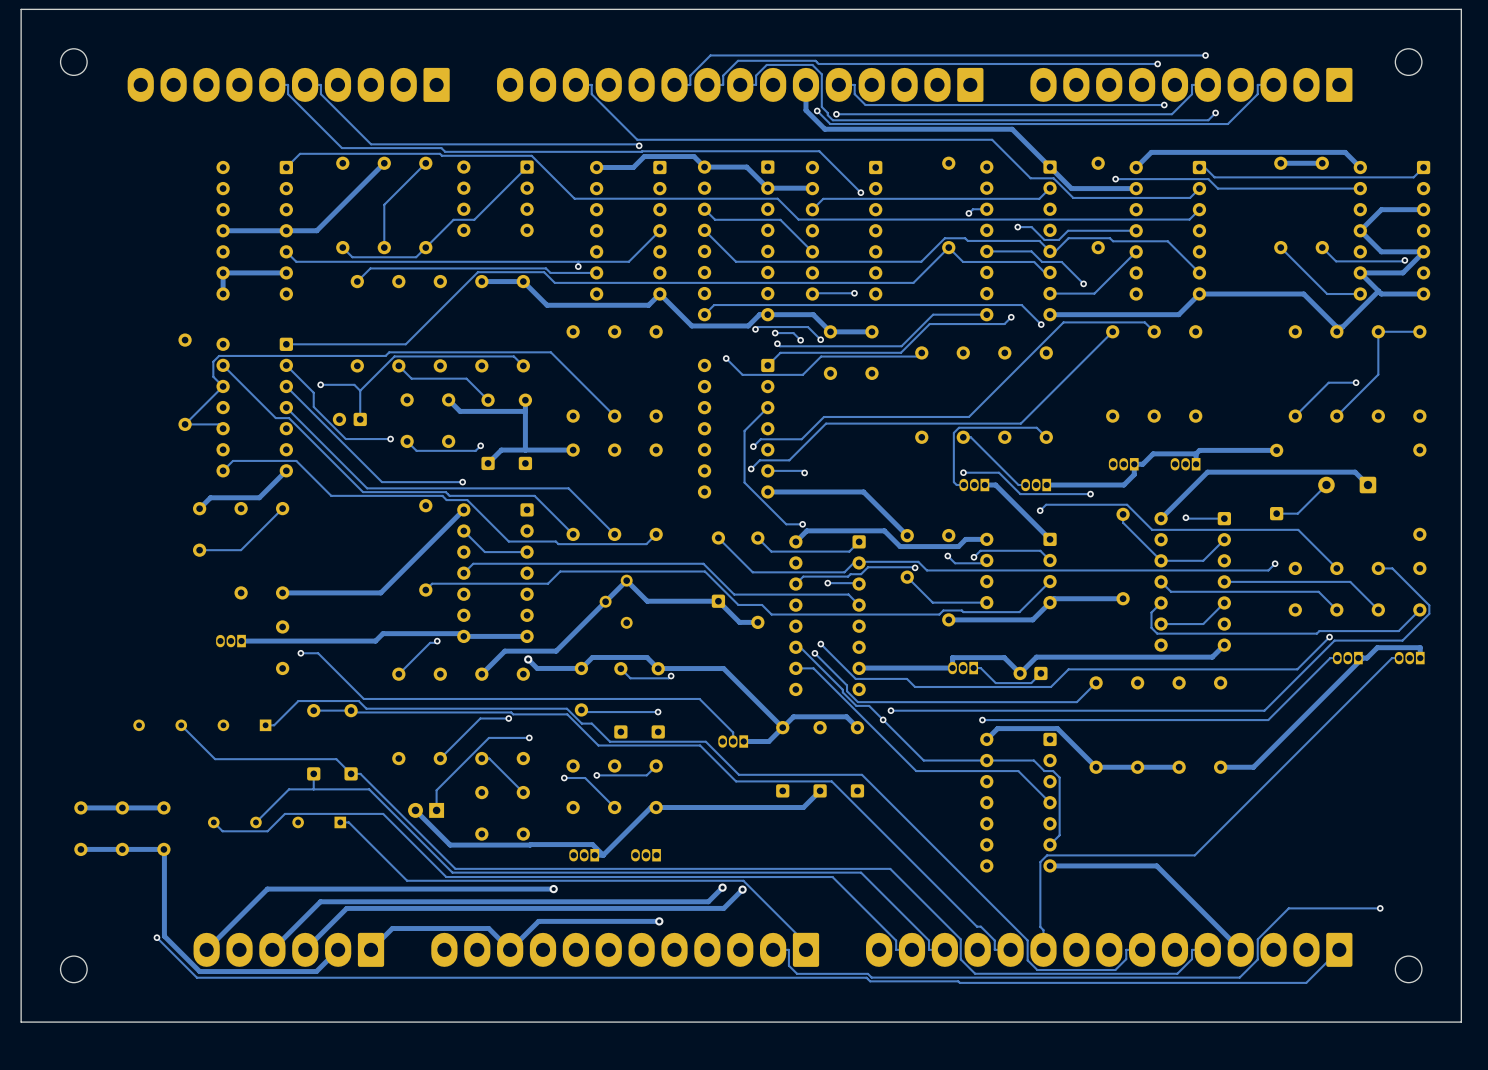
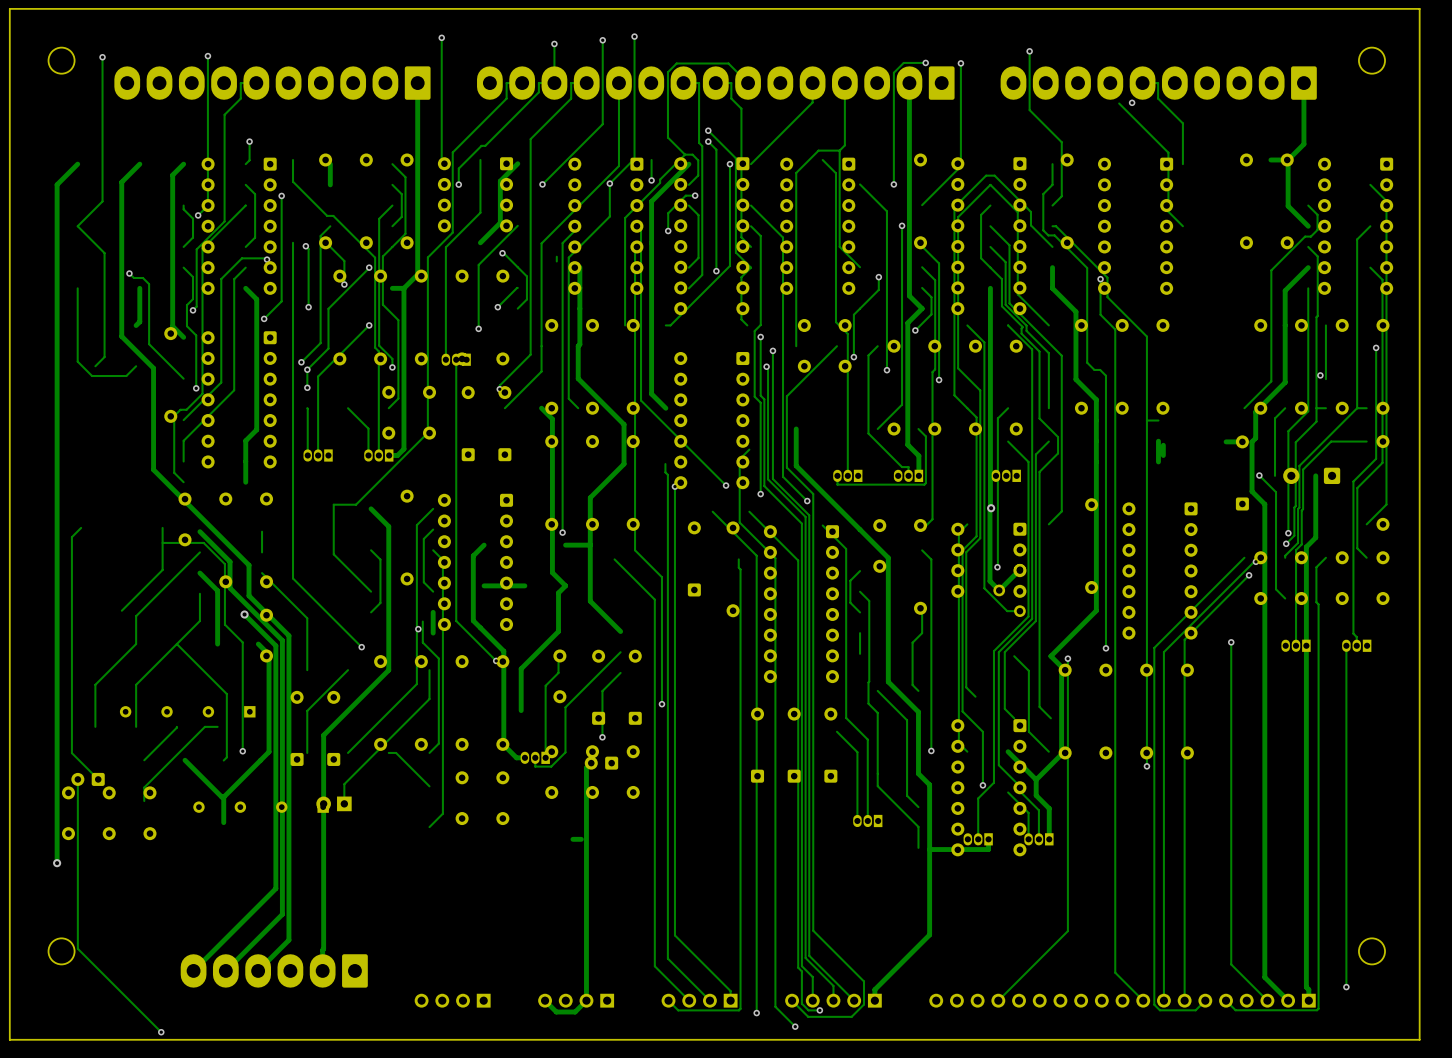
board edge: (1457, 9) (1461, 9) (1461, 1022) (21, 1022) -> (1419, 8) (1419, 1039) (9, 1039) (9, 1003)
track: none -> (634, 36) (634, 158) (609, 183) (609, 216) (568, 257) (568, 398) (578, 408)
via: none -> (634, 36)
track: none -> (441, 37) (441, 159)
via: none -> (441, 37)
track: none -> (602, 40) (602, 124) (542, 184)
via: none -> (602, 40)
track: none -> (554, 43) (554, 83) (538, 83) (538, 92) (485, 145) (481, 145) (458, 168) (458, 184)
via: none -> (554, 43)
track: none -> (1029, 51) (1029, 110) (1061, 142) (1061, 196) (1052, 205)
via: none -> (1029, 51)
track: (1205, 55) (710, 55) (690, 75) (690, 84) (674, 84) -> none
via: (1205, 55) -> none
track: none -> (207, 56) (207, 205) (198, 215)
via: none -> (207, 56)
track: none -> (102, 57) (102, 201) (77, 226) (104, 253) (104, 357) (95, 366)
via: none -> (102, 57)
track: (1157, 63) (818, 63) (815, 60) (738, 60) (723, 75) (723, 84) -> (688, 288) (702, 274) (702, 146) (699, 142) (699, 83)
track: none -> (925, 62) (903, 62) (893, 72) (893, 184)
via: none -> (925, 62)
track: none -> (960, 63) (960, 166) (922, 205)
via: none -> (960, 63)
via: (1157, 64) -> none
track: (272, 84) (288, 84) (288, 94) (341, 148) (441, 148) (445, 151) (819, 151) (860, 192) -> (256, 83) (240, 83) (240, 98) (224, 114) (224, 221) (196, 249) (196, 306) (193, 310)
track: (305, 84) (320, 84) (320, 94) (371, 144) (639, 145) -> none
track: none -> (417, 83) (417, 274) (403, 288)
track: none -> (522, 83) (506, 83) (506, 98) (452, 152) (452, 232) (427, 257) (427, 432) (356, 504) (333, 504) (333, 554) (371, 591)
track: (575, 84) (591, 84) (591, 94) (637, 139) (992, 139) (1030, 178) (1053, 178) (1073, 197) (1190, 197) (1199, 188) -> none
track: none -> (586, 83) (571, 83) (571, 98) (530, 139) (530, 354) (499, 385) (499, 389)
track: none -> (618, 83) (618, 166) (541, 243) (541, 371) (504, 408)
track: (756, 84) (756, 75) (766, 64) (812, 64) (821, 74) (821, 106) (832, 120) (1208, 120) (1215, 112) -> (731, 83) (731, 98) (741, 108) (741, 237) (751, 246)
track: none -> (748, 83) (728, 63) (676, 63) (667, 72) (667, 137) (685, 154)
track: (805, 84) (805, 110) (824, 129) (1012, 129) (1071, 188) (1136, 188) -> none
track: (838, 84) (854, 84) (854, 94) (865, 105) (1164, 105) -> (812, 83) (812, 102) (751, 164)
track: none -> (844, 83) (844, 145) (839, 150)
track: none -> (909, 83) (909, 295) (922, 308) (907, 322) (907, 444) (918, 455) (918, 475)
track: none -> (1142, 83) (1158, 83) (1158, 98) (1182, 123) (1182, 164)
track: (1207, 84) (1192, 84) (1192, 94) (1171, 114) (836, 114) -> none
track: (1273, 84) (1257, 84) (1257, 94) (1227, 124) (830, 124) (817, 110) -> none
track: none -> (1303, 83) (1303, 144) (1288, 159) (1288, 206) (1308, 226)
track: none -> (1119, 103) (1168, 152) (1168, 211) (1182, 226)
via: (817, 110) -> none
via: (1215, 112) -> none
via: (836, 114) -> none
track: none -> (708, 130) (735, 158) (735, 252) (751, 267) (741, 277) (741, 319) (747, 325)
via: none -> (708, 130)
track: none -> (249, 141) (249, 160) (245, 164)
via: none -> (249, 141)
track: none -> (708, 141) (716, 149) (716, 271)
via: none -> (708, 141)
via: (639, 145) -> none
track: none -> (839, 150) (839, 246) (860, 267)
track: none -> (839, 150) (818, 150) (796, 172) (796, 346)
track: none -> (685, 154) (692, 154) (698, 160) (698, 175) (688, 184)
track: none -> (685, 154) (625, 217) (625, 325)
track: none -> (293, 159) (293, 181) (327, 215) (333, 215) (375, 257) (375, 347) (378, 351) (378, 455)
track: (384, 163) (316, 230) (223, 230) -> none
track: (425, 163) (384, 204) (384, 247) -> none
track: none -> (480, 159) (480, 212) (445, 247) (445, 359)
track: none -> (651, 159) (651, 180)
track: none -> (822, 159) (835, 173) (835, 322) (847, 333) (847, 475)
track: (1305, 163) (1280, 163) -> none
track: none -> (77, 164) (57, 184) (57, 863)
track: none -> (139, 164) (121, 182) (121, 336) (153, 368) (153, 469) (249, 565) (249, 595) (288, 635) (288, 940) (258, 970)
track: none -> (183, 164) (172, 175) (172, 326) (183, 337)
track: (286, 167) (300, 153) (531, 155) (574, 198) (777, 198) (798, 219) (1189, 219) (1199, 209) -> none
track: none -> (330, 164) (330, 184)
track: none -> (392, 164) (405, 177) (405, 233) (382, 256) (382, 304) (398, 320) (398, 398) (388, 408)
track: (527, 167) (474, 219) (453, 219) (416, 257) (352, 257) (342, 247) -> none
track: none -> (517, 163) (500, 181) (500, 222) (480, 242)
track: (596, 167) (633, 167) (644, 156) (693, 156) (704, 167) (746, 167) (767, 188) (812, 188) -> none
track: none -> (688, 164) (651, 201) (651, 393) (665, 408)
track: none -> (729, 164) (729, 265) (670, 325) (665, 325)
via: none -> (729, 164)
track: none -> (1052, 164) (1052, 184) (1043, 194) (1043, 230) (1048, 235) (1054, 235) (1087, 268) (1087, 362) (1094, 369) (1100, 369) (1105, 375) (1105, 648)
track: (1360, 167) (1345, 152) (1151, 152) (1136, 167) -> none
track: (1423, 167) (1413, 177) (1214, 177) (1204, 167) (1199, 167) -> none
track: (1115, 179) (1208, 179) (1217, 188) (1360, 188) -> none
via: (1115, 179) -> none
via: none -> (651, 180)
via: none -> (609, 183)
track: none -> (245, 184) (255, 194) (255, 237) (245, 246)
track: none -> (392, 184) (401, 194) (401, 216) (392, 226)
via: none -> (458, 184)
via: none -> (542, 184)
track: none -> (860, 184) (886, 211) (886, 370)
via: none -> (893, 184)
track: (1050, 188) (1039, 198) (823, 198) (812, 209) -> none
track: none -> (1370, 184) (1386, 200) (1386, 504) (1366, 524)
via: (860, 192) -> none
track: none -> (281, 195) (281, 301) (264, 318)
via: none -> (281, 195)
track: none -> (695, 195) (685, 195) (668, 213) (668, 231)
via: none -> (695, 195)
track: none -> (183, 205) (183, 209) (193, 218) (193, 237) (183, 246)
track: none -> (245, 205) (202, 248) (202, 393) (186, 409) (180, 409) (174, 416) (174, 472) (183, 482)
track: none -> (392, 205) (379, 218) (379, 345) (392, 358) (392, 367)
track: (704, 209) (715, 219) (780, 219) (812, 251) -> none
track: none -> (688, 205) (698, 215) (698, 258) (688, 267)
track: none -> (751, 205) (783, 237) (783, 476) (807, 501)
track: (986, 209) (973, 209) (968, 213) -> none
track: none -> (990, 205) (981, 214) (981, 258) (1001, 279) (1001, 306) (1022, 326) (1021, 333) (1039, 351) (1039, 418) (1058, 437) (1058, 453) (1039, 471) (1039, 706) (1050, 718)
track: none -> (1308, 205) (1317, 214) (1317, 229) (1310, 236) (1305, 236) (1271, 270) (1271, 381) (1244, 408)
track: (1423, 209) (1381, 209) (1360, 230) (1381, 251) (1423, 251) (1402, 272) (1360, 272) (1381, 294) (1423, 294) -> none
via: (968, 213) -> none
via: none -> (198, 215)
track: (1017, 227) (1031, 227) (1044, 239) (1058, 239) (1068, 230) (1083, 230) -> none
via: (1017, 227) -> none
track: none -> (641, 225) (641, 400) (726, 485)
track: none -> (330, 226) (320, 235) (320, 343) (301, 362)
track: none -> (517, 225) (478, 264) (478, 328)
track: none -> (579, 225) (562, 243) (562, 532)
track: (659, 230) (628, 261) (296, 261) (286, 251) -> none
track: (704, 230) (735, 261) (921, 261) (944, 238) (965, 238) (967, 240) (1039, 240) (1050, 251) (1055, 251) (1068, 238) (1109, 238) (1113, 241) (1167, 241) (1199, 272) -> none
track: none -> (751, 226) (760, 236) (760, 324) (754, 331) (754, 396) (760, 402) (760, 494)
track: none -> (902, 225) (902, 404) (877, 429)
via: none -> (902, 225)
track: none -> (990, 226) (1009, 245) (1009, 303) (1061, 355) (1061, 511) (1048, 524)
track: (1136, 230) (1086, 230) -> (1146, 766) (1146, 336) (1107, 297) (1107, 277) (1056, 226)
track: none -> (1370, 226) (1357, 239) (1357, 408)
via: none -> (668, 231)
track: none -> (293, 242) (293, 578) (361, 647)
track: (1280, 247) (1327, 294) (1360, 294) -> none
track: (1322, 247) (1336, 261) (1404, 260) -> none
track: none -> (305, 246) (308, 248) (308, 307)
via: none -> (305, 246)
track: none -> (330, 246) (344, 261) (344, 284)
track: none -> (922, 246) (939, 263) (939, 380)
track: (986, 251) (1031, 251) (1042, 261) (1061, 261) (1083, 283) -> none
track: none -> (990, 246) (1005, 262) (1005, 304) (1026, 325) (1026, 330) (1048, 353) (1048, 408)
track: none -> (1052, 246) (1030, 225) (1030, 211) (994, 175) (986, 175) (954, 207) (954, 395) (976, 417) (976, 536) (962, 550) (962, 711) (982, 731) (982, 785)
track: (1136, 251) (1094, 293) (1050, 293) -> none
track: none -> (1308, 246) (1317, 256) (1316, 421) (1295, 442) (1294, 535) (1286, 543)
track: none -> (635, 250) (635, 550) (661, 577) (661, 704)
track: none -> (502, 253) (526, 276) (526, 299) (517, 308)
via: none -> (502, 253)
via: (1404, 260) -> none
track: none -> (267, 259) (241, 258) (221, 279) (221, 382) (183, 420)
via: none -> (267, 259)
via: (578, 266) -> none
track: none -> (183, 267) (193, 277) (193, 299) (186, 305) (186, 326) (196, 335) (196, 388)
track: none -> (245, 267) (234, 279) (234, 390) (183, 440) (183, 461)
track: (286, 272) (223, 272) (223, 294) -> none
track: none -> (369, 267) (328, 308) (328, 348) (307, 369)
via: none -> (369, 267)
track: (596, 272) (550, 272) (546, 268) (370, 268) (357, 281) -> none
track: none -> (579, 267) (578, 378) (624, 424) (624, 464) (590, 497) (590, 601) (620, 631)
track: none -> (922, 267) (935, 280) (935, 369) (932, 372) (932, 519) (922, 529)
track: (1050, 272) (1044, 272) (1034, 261) (963, 261) (948, 247) (913, 282) (554, 282) (544, 272) (477, 272) (405, 344) (286, 344) -> none
track: none -> (1052, 267) (1052, 288) (1075, 311) (1075, 379) (1096, 399) (1096, 610) (1050, 656) (1061, 666) (1061, 754) (1036, 779)
track: none -> (1308, 267) (1285, 290) (1285, 382) (1255, 411) (1255, 438) (1252, 441) (1252, 491) (1264, 504) (1264, 977) (1288, 1000)
track: none -> (1370, 267) (1382, 279) (1382, 462) (1357, 488) (1357, 548) (1366, 557)
via: none -> (716, 271)
track: none -> (129, 273) (133, 277) (142, 277) (149, 284) (149, 344) (183, 378)
via: none -> (129, 273)
track: (481, 281) (523, 281) (547, 305) (648, 305) (659, 294) (691, 325) (748, 325) (759, 314) (813, 314) (830, 331) (871, 331) -> none
track: none -> (878, 277) (878, 289) (853, 314) (853, 357)
via: none -> (878, 277)
via position: (1083, 283) -> (1100, 279)
track: none -> (1100, 279) (1100, 314) (1115, 329) (1115, 972) (1143, 1000)
via: none -> (344, 284)
track: (1378, 291) (1342, 327) (1336, 327) -> none
track: none -> (517, 287) (497, 307)
track: (854, 293) (812, 294) -> none
via: (854, 293) -> none
track: none -> (922, 287) (931, 297) (931, 314) (915, 330)
track: none -> (77, 288) (77, 361) (92, 376) (126, 376) (136, 366)
track: none -> (139, 288) (139, 321) (136, 325)
track: none -> (245, 288) (256, 299) (256, 429) (245, 440) (245, 482)
track: none -> (403, 288) (403, 449) (397, 455) (389, 455)
track: none -> (403, 288) (392, 288)
track: none -> (990, 288) (990, 581) (999, 590) (1019, 569)
track: none -> (1308, 288) (1308, 411) (1288, 431) (1288, 533)
via: none -> (308, 307)
via: none -> (497, 307)
track: (704, 314) (714, 305) (1021, 305) (1041, 324) -> none
track: (986, 314) (933, 314) (901, 346) (779, 346) (777, 343) -> none
track: (1050, 314) (1178, 314) (1199, 294) (1303, 294) (1336, 327) -> none
via: none -> (193, 310)
track: (1011, 317) (1004, 324) (929, 324) (900, 352) (780, 352) (767, 365) -> none
via: (1011, 317) -> none
via: (1041, 324) -> none
via: none -> (264, 318)
track: (755, 329) (757, 327) (807, 327) (820, 339) -> none
via: (755, 329) -> none
track: none -> (369, 325) (318, 376) (318, 455)
via: none -> (369, 325)
track: none -> (967, 325) (984, 342) (984, 588) (1007, 611) (1019, 611)
track: none -> (1008, 325) (1032, 349) (1032, 618) (998, 652) (998, 765) (1021, 787) (1021, 792) (1038, 810) (1038, 839)
track: none -> (1048, 325) (1017, 294) (1017, 212) (990, 184) (958, 217) (958, 368) (980, 390) (980, 538) (966, 552) (966, 687) (975, 696)
track: (1112, 331) (1020, 423) (826, 423) (789, 460) (759, 460) (751, 468) -> none
track: (1154, 331) (1144, 322) (1063, 322) (968, 416) (824, 416) (801, 439) (760, 439) (753, 446) -> none
track: none -> (1325, 325) (1325, 379)
track: (1419, 331) (1378, 331) (1378, 374) (1336, 416) -> none
track: (775, 333) (793, 333) (800, 340) -> none
via: (775, 333) -> none
via: none -> (478, 328)
via: none -> (915, 330)
via: (820, 339) -> none
via: (800, 340) -> none
via: (777, 343) -> none
track: none -> (760, 337) (760, 395) (764, 399) (764, 486) (801, 523) (801, 966) (812, 977) (812, 1000)
via: none -> (760, 337)
track: none -> (836, 346) (786, 396) (786, 467) (813, 493) (813, 930) (863, 981) (863, 1004) (851, 1016) (808, 1016) (792, 1000)
track: none -> (877, 346) (868, 355) (868, 433) (902, 467) (908, 467) (908, 475)
track: (921, 352) (918, 356) (821, 356) (802, 374) (742, 374) (726, 358) -> none
track: none -> (1376, 347) (1376, 458) (1353, 481) (1353, 633) (1356, 637) (1356, 645)
via: none -> (1376, 347)
track: none -> (772, 350) (772, 478) (809, 515) (809, 955) (854, 1000)
via: none -> (772, 350)
via: (726, 358) -> none
via: none -> (853, 357)
track: (223, 365) (275, 418) (289, 418) (363, 492) (445, 492) (449, 495) (534, 495) (573, 534) -> none
track: (286, 365) (313, 392) (313, 406) (345, 439) (390, 439) -> none
track: (398, 365) (411, 378) (466, 378) (488, 400) -> none
track: (523, 365) (513, 356) (394, 356) (360, 390) -> none
track: none -> (456, 359) (456, 620) (496, 660)
part: none -> (456, 359)
via: none -> (301, 362)
track: none -> (766, 366) (768, 479) (805, 516) (805, 958) (833, 985) (833, 1000)
via: none -> (766, 366)
via: none -> (392, 367)
track: none -> (307, 369) (307, 387)
via: none -> (307, 369)
via: none -> (886, 370)
track: (1356, 382) (1328, 382) (1295, 416) -> none
track: (320, 384) (354, 384) (360, 390) -> none
via: (320, 384) -> none
track: (286, 386) (381, 482) (462, 482) -> none
via: none -> (939, 380)
track: (360, 390) (360, 419) -> none
via: none -> (196, 388)
via: none -> (307, 387)
via: none -> (499, 389)
track: (448, 399) (460, 411) (525, 411) -> none
track: (525, 400) (525, 450) -> none
track: (286, 407) (367, 488) (568, 488) (614, 534) -> none
track: (767, 407) (744, 430) (744, 482) (786, 524) (802, 524) -> none
track: none -> (307, 408) (307, 455)
track: none -> (348, 408) (368, 428) (368, 455)
track: none -> (541, 408) (552, 419) (552, 572) (565, 585) (558, 592) (558, 631) (521, 668) (521, 710)
track: (614, 416) (550, 352) (389, 352) (385, 355) (219, 355) (213, 361) (213, 376) (223, 386) (185, 424) (218, 424) (223, 428) -> none
track: none -> (1008, 408) (997, 418) (997, 567)
track: none -> (1285, 408) (1275, 418) (1275, 475)
track: none -> (1325, 408) (1316, 408)
track: none -> (1357, 408) (1299, 465) (1298, 542) (1285, 557)
track: none -> (1366, 408) (1357, 408)
part: (349, 419) -> none
track: none -> (1158, 420) (1146, 420)
track: none -> (796, 429) (796, 465) (888, 557) (888, 681) (918, 712) (918, 773) (929, 784) (929, 934) (874, 989) (874, 1000)
track: none -> (918, 429) (925, 436) (924, 484) (837, 484) (837, 475)
track: (963, 437) (970, 437) (1018, 485) (1025, 485) -> none
track: (1046, 437) (1036, 427) (959, 427) (953, 432) (953, 482) (956, 485) (963, 485) -> none
via: (390, 439) -> none
track: (407, 441) (416, 450) (475, 450) (480, 445) -> none
via: (480, 445) -> none
via: (753, 446) -> none
track: none -> (1158, 441) (1158, 461)
track: (573, 450) (501, 450) (488, 463) -> none
track: none -> (1008, 441) (1028, 461) (1028, 616) (993, 651) (993, 782) (978, 798) (978, 839)
track: none -> (1048, 441) (1035, 454) (1035, 621) (1004, 652) (1004, 708) (1014, 718)
track: (1260, 450) (1199, 450) (1196, 453) (1153, 453) (1142, 464) (1134, 464) (1134, 474) (1123, 485) (1046, 485) -> none
track: none -> (1366, 441) (1331, 441) (1303, 469) (1301, 544) (1296, 550) (1296, 645)
track: none -> (749, 449) (739, 459) (739, 522) (775, 558) (775, 1006) (795, 1026)
part: none -> (318, 455)
part: none -> (378, 455)
part: (1123, 464) -> none
part: (1185, 464) -> none
via: (751, 468) -> none
track: (223, 470) (232, 460) (296, 460) (331, 495) (442, 495) (446, 500) (467, 500) (508, 541) (555, 541) (558, 544) (646, 544) (656, 534) -> none
track: (286, 470) (259, 497) (210, 497) (199, 508) -> none
track: (767, 470) (802, 470) (804, 472) -> none
track: none -> (665, 464) (665, 472) (667, 474) (667, 958) (709, 1000)
via: (804, 472) -> none
track: (963, 472) (999, 472) (1020, 494) (1090, 494) -> none
via: (963, 472) -> none
via: (462, 482) -> none
track: none -> (1259, 475) (1276, 492) (1276, 589) (1285, 598)
via: none -> (1259, 475)
part: none -> (847, 475)
part position: (974, 485) -> (908, 475)
track: (984, 485) (995, 485) (1050, 539) -> none
track: (1326, 485) (1297, 513) (1276, 513) -> none
track: none -> (1315, 475) (1315, 537) (1306, 547) (1306, 987) (1308, 989) (1308, 1000)
track: (1367, 485) (1355, 472) (1207, 472) (1161, 518) -> none
track: (767, 491) (863, 491) (907, 535) -> none
via: none -> (726, 485)
via: (1090, 494) -> none
track: none -> (674, 486) (674, 935) (730, 991) (730, 1000)
via: none -> (674, 486)
via: none -> (760, 494)
track: (282, 508) (241, 550) (199, 550) -> none
track: (463, 509) (380, 592) (282, 592) -> none
via: none -> (807, 501)
track: (1040, 510) (1046, 504) (1127, 504) (1152, 529) (1298, 529) (1336, 568) -> none
via: (1040, 510) -> none
track: (1123, 514) (1123, 522) (1161, 560) (1203, 560) (1224, 539) -> none
via: none -> (991, 508)
track: (1185, 517) (1224, 518) -> none
via: (1185, 517) -> none
track: none -> (371, 508) (388, 526) (388, 670) (323, 735) (322, 970)
track: none -> (433, 508) (416, 525) (416, 684) (348, 752)
track: none -> (712, 511) (756, 555) (756, 1013)
track: none -> (749, 511) (798, 560) (798, 967) (801, 971) (801, 1003) (808, 1010) (819, 1010)
via: (802, 524) -> none
track: (463, 531) (484, 552) (527, 552) -> none
track: none -> (967, 524) (958, 532) (958, 743) (967, 751)
track: none -> (822, 525) (846, 548) (846, 717) (867, 739) (867, 820)
track: (718, 537) (752, 572) (844, 572) (853, 562) (860, 561) (918, 561) (926, 570) (1268, 570) (1275, 563) -> none
track: none -> (81, 527) (71, 537) (71, 753) (98, 779)
track: none -> (162, 527) (162, 569) (121, 610)
track: (757, 538) (771, 551) (849, 551) (859, 541) -> none
track: none -> (433, 529) (423, 538) (423, 582) (433, 591)
track: (986, 539) (965, 539) (958, 546) (900, 546) (884, 530) (806, 530) (795, 541) -> none
track: none -> (199, 531) (230, 561) (230, 588) (282, 640) (282, 914) (225, 970)
track: none -> (262, 531) (262, 552)
via: none -> (562, 532)
via: none -> (1288, 533)
track: none -> (162, 542) (203, 542) (224, 564) (224, 624) (242, 642) (242, 751)
via: none -> (1286, 543)
track: none -> (484, 545) (473, 555) (473, 620) (503, 651) (503, 745) (516, 757) (524, 757)
track: none -> (590, 545) (565, 545)
track: (947, 556) (955, 563) (983, 563) (986, 560) -> none
via: (947, 556) -> none
track: (974, 557) (980, 550) (1040, 550) (1050, 560) -> none
via: (974, 557) -> none
track: none -> (371, 550) (380, 559) (380, 602) (371, 612)
track: none -> (433, 550) (442, 560) (442, 813) (429, 827)
track: none -> (922, 550) (931, 559) (931, 750)
track: none -> (199, 552) (136, 616) (136, 644) (95, 684) (95, 726)
via: (1275, 563) -> none
track: (915, 567) (868, 567) (861, 574) (850, 574) (848, 576) (803, 576) (795, 584) -> none
via: (915, 567) -> none
track: none -> (1244, 557) (1154, 647) (1154, 1004) (1159, 1010) (1195, 1010) (1205, 1000)
track: none -> (1325, 557) (1316, 567) (1316, 602) (1318, 604) (1318, 1008) (1235, 1010) (1226, 1000)
track: (1378, 568) (1392, 568) (1429, 605) (1429, 613) (1402, 640) (1334, 640) (1264, 710) (890, 710) -> none
track: none -> (614, 559) (654, 599) (654, 966) (689, 1000)
track: none -> (738, 559) (740, 569) (740, 1008) (678, 1010) (668, 1000)
track: none -> (1255, 561) (1163, 652) (1163, 1000)
via: none -> (1255, 561)
track: (463, 573) (473, 563) (703, 563) (734, 594) (848, 594) (859, 605) -> none
track: (907, 577) (932, 602) (986, 602) -> none
via: none -> (997, 567)
track: none -> (860, 571) (850, 580) (850, 602) (860, 612)
track: (1050, 581) (1019, 612) (943, 610) (939, 614) (771, 614) (762, 604) (738, 604) (704, 571) (560, 571) (548, 583) (432, 583) (425, 590) -> none
track: (1161, 581) (1171, 591) (1318, 591) (1336, 609) -> none
track: (1224, 581) (1350, 581) (1378, 609) -> none
track: (827, 583) (859, 584) -> none
via: (827, 583) -> none
track: none -> (199, 573) (217, 590) (217, 644)
track: none -> (262, 573) (307, 618) (307, 670)
track: none -> (1249, 575) (1184, 639) (1184, 1000)
via: none -> (1249, 575)
track: none -> (524, 585) (484, 585)
track: (1123, 598) (1053, 598) (1032, 619) (948, 619) -> none
part: (616, 601) -> none
part: none -> (1009, 590)
track: (1161, 602) (1151, 612) (1151, 627) (1157, 633) (1316, 633) (1319, 631) (1398, 631) (1419, 609) -> none
track: (1224, 602) (1203, 624) (1161, 624) -> none
track: none -> (860, 591) (869, 600) (868, 703) (877, 712) (877, 786) (918, 826) (918, 847)
track: none -> (199, 593) (199, 621) (136, 684) (136, 726)
track: (757, 622) (739, 622) (718, 601) (647, 601) (626, 580) (556, 651) (504, 651) (481, 674) -> none
track: none -> (433, 612) (433, 633)
track: none -> (922, 612) (922, 633) (912, 642) (912, 685) (918, 690)
track: none -> (244, 614) (275, 645) (275, 888) (193, 970)
via: none -> (244, 614)
track: none -> (422, 621) (422, 642) (438, 658) (438, 743) (429, 752)
track: (527, 636) (463, 636) (461, 633) (383, 633) (375, 641) (241, 641) -> none
track: (1329, 637) (1297, 669) (1068, 669) (1050, 687) (915, 687) (906, 678) (855, 678) (820, 644) -> none
via: (1329, 637) -> none
part: (230, 641) -> none
track: (437, 641) (430, 642) (398, 674) -> none
via: (820, 644) -> none
track: none -> (860, 633) (860, 653)
track: (1224, 645) (1212, 657) (1036, 657) (1020, 673) (1004, 657) (952, 657) (952, 668) (859, 668) -> none
track: (795, 647) (800, 647) (856, 705) (869, 705) (923, 760) (1033, 760) (1044, 771) (1053, 771) (1059, 777) (1059, 835) (1050, 844) -> none
track: (300, 653) (318, 653) (363, 698) (699, 698) (733, 732) (733, 741) -> none
via: (300, 653) -> none
track: (814, 653) (847, 685) (847, 691) (857, 702) (1076, 702) (1096, 682) -> none
via: (814, 653) -> none
track: none -> (1231, 642) (1231, 964) (1267, 1000)
via: none -> (1231, 642)
track: none -> (176, 644) (226, 694) (226, 757) (223, 760)
track: none -> (258, 644) (269, 654) (269, 751) (223, 797)
track: (1337, 658) (1330, 658) (1268, 720) (982, 720) -> none
part position: (1347, 658) -> (1296, 645)
track: (1362, 658) (1253, 767) (1220, 767) -> none
track: none -> (1346, 645) (1346, 987)
track: (1399, 658) (1392, 658) (1194, 855) (1047, 855) (1040, 862) (1040, 927) (1043, 930) (1043, 949) -> none
part position: (1409, 658) -> (1356, 645)
track: (1420, 658) (1420, 647) (1377, 647) (1366, 658) (1358, 658) -> none
via: none -> (361, 647)
track: (528, 659) (537, 668) (581, 668) (592, 657) (647, 657) (658, 668) (723, 668) (782, 727) -> none
via: (528, 659) -> none
via: none -> (1105, 648)
track: none -> (558, 652) (558, 672) (545, 685) (545, 757)
track: none -> (620, 652) (565, 707) (565, 752) (551, 766) (535, 766) (535, 757)
track: (620, 668) (630, 678) (668, 678) (671, 676) -> none
track: (795, 668) (813, 668) (916, 771) (1018, 771) (1050, 802) -> none
part: (963, 668) -> none
track: (973, 668) (980, 668) (995, 683) (1031, 683) (1040, 673) -> none
track: none -> (1014, 656) (1028, 670) (1028, 731) (1048, 751)
track: none -> (1067, 658) (1067, 931) (998, 1000)
via: none -> (1067, 658)
via: none -> (496, 660)
part: (1030, 673) -> none
via: (671, 676) -> none
track: none -> (348, 670) (307, 710) (307, 752)
track: none -> (429, 670) (429, 699) (344, 784) (344, 803)
track: none -> (620, 672) (602, 691) (602, 737)
track: none -> (877, 690) (907, 720) (907, 795) (918, 807)
track: (581, 709) (583, 712) (658, 712) -> none
track: (313, 710) (567, 714) (598, 745) (700, 745) (736, 781) (831, 781) (977, 926) (980, 926) (994, 940) (994, 949) (1010, 949) -> none
via: (890, 710) -> none
via: (658, 712) -> none
via: none -> (661, 704)
track: (508, 718) (480, 718) (440, 758) -> none
via: (508, 718) -> none
via: (883, 719) -> none
via: (982, 720) -> none
track: (181, 725) (215, 759) (336, 759) (351, 773) (360, 773) (455, 868) (890, 868) (960, 939) (960, 959) (975, 973) (1177, 973) (1192, 959) (1192, 949) (1207, 949) -> none
track: (265, 725) (274, 725) (298, 701) (358, 701) (366, 708) (566, 708) (581, 723) (591, 723) (610, 741) (705, 741) (738, 774) (862, 774) (1027, 940) (1027, 960) (1037, 970) (1115, 970) (1126, 959) (1126, 949) (1142, 949) -> none
track: (857, 727) (846, 716) (793, 716) (768, 741) (743, 741) -> none
track: (529, 737) (488, 737) (436, 790) (436, 810) -> none
via: (529, 737) -> none
track: (986, 739) (997, 728) (1057, 728) (1096, 767) (1179, 767) -> none
track: none -> (176, 726) (144, 760)
track: none -> (217, 726) (204, 726) (144, 787) (144, 801)
part: (733, 741) -> none
track: none -> (836, 731) (857, 752) (857, 820)
via: none -> (602, 737)
track: (481, 758) (489, 758) (523, 792) -> (388, 752) (396, 752) (429, 786)
via: none -> (242, 751)
via: none -> (931, 750)
track: (656, 766) (646, 775) (596, 775) -> none
track: none -> (1008, 751) (1036, 779)
part: none -> (535, 757)
track: (313, 773) (313, 789) -> none
track: none -> (185, 760) (223, 797)
via: (596, 775) -> none
track: none -> (591, 763) (586, 767) (586, 1000) (575, 1012) (556, 1012) (545, 1000)
part: none -> (601, 763)
track: (564, 778) (585, 778) (614, 807) -> none
via: (564, 778) -> none
via: none -> (1146, 766)
track: (820, 790) (803, 807) (650, 807) (603, 855) (592, 844) (450, 845) (415, 810) -> none
track: none -> (77, 779) (77, 948) (161, 1032)
part: none -> (88, 779)
track: none -> (1036, 779) (1036, 795) (1049, 808) (1049, 839)
via: none -> (982, 785)
track: (163, 807) (80, 807) -> none
track: none -> (1008, 792) (1028, 812) (1028, 839)
part position: (426, 810) -> (333, 803)
track: none -> (223, 797) (223, 822)
track: (213, 822) (222, 831) (267, 831) (284, 813) (383, 813) (446, 877) (832, 877) (896, 940) (896, 949) (911, 949) -> none
track: (255, 822) (289, 789) (369, 789) (452, 872) (861, 872) (929, 940) (929, 949) (944, 949) -> none
track: (340, 822) (348, 822) (407, 880) (743, 880) (805, 943) (805, 949) -> none
part: none -> (867, 820)
track: (80, 849) (164, 849) (164, 936) (199, 971) (316, 971) (338, 949) -> none
part: (584, 855) -> none
part: (646, 855) -> none
part: none -> (978, 839)
track: none -> (988, 839) (988, 849) (929, 849)
part: none -> (1038, 839)
track: (1050, 865) (1156, 865) (1240, 949) -> none
via: none -> (57, 863)
track: (722, 887) (708, 901) (320, 901) (272, 949) -> none
via: (722, 887) -> none
track: (553, 889) (267, 889) (206, 949) -> none
via: (553, 889) -> none
track: (742, 889) (723, 908) (346, 908) (305, 949) -> none
via: (742, 889) -> none
track: (1380, 908) (1288, 908) (1257, 939) (1257, 959) (1239, 977) (871, 977) (867, 973) (797, 973) (788, 965) (788, 949) (773, 949) -> none
via: (1380, 908) -> none
track: (659, 921) (538, 921) (510, 949) (488, 928) (392, 928) (371, 949) -> none
via: (659, 921) -> none
track: (156, 937) (196, 977) (866, 977) (870, 981) (958, 981) (959, 982) (1306, 982) (1339, 949) -> none
via: (156, 937) -> none
part position: (288, 949) -> (274, 970)
part: (625, 949) -> none
part: (1109, 949) -> none
via: none -> (1346, 987)
part: none -> (452, 1000)
part: none -> (576, 1000)
part: none -> (699, 1000)
part: none -> (833, 1000)
part: none -> (1122, 1000)
via: none -> (819, 1010)
via: none -> (756, 1013)
via: none -> (795, 1026)
via: none -> (161, 1032)

